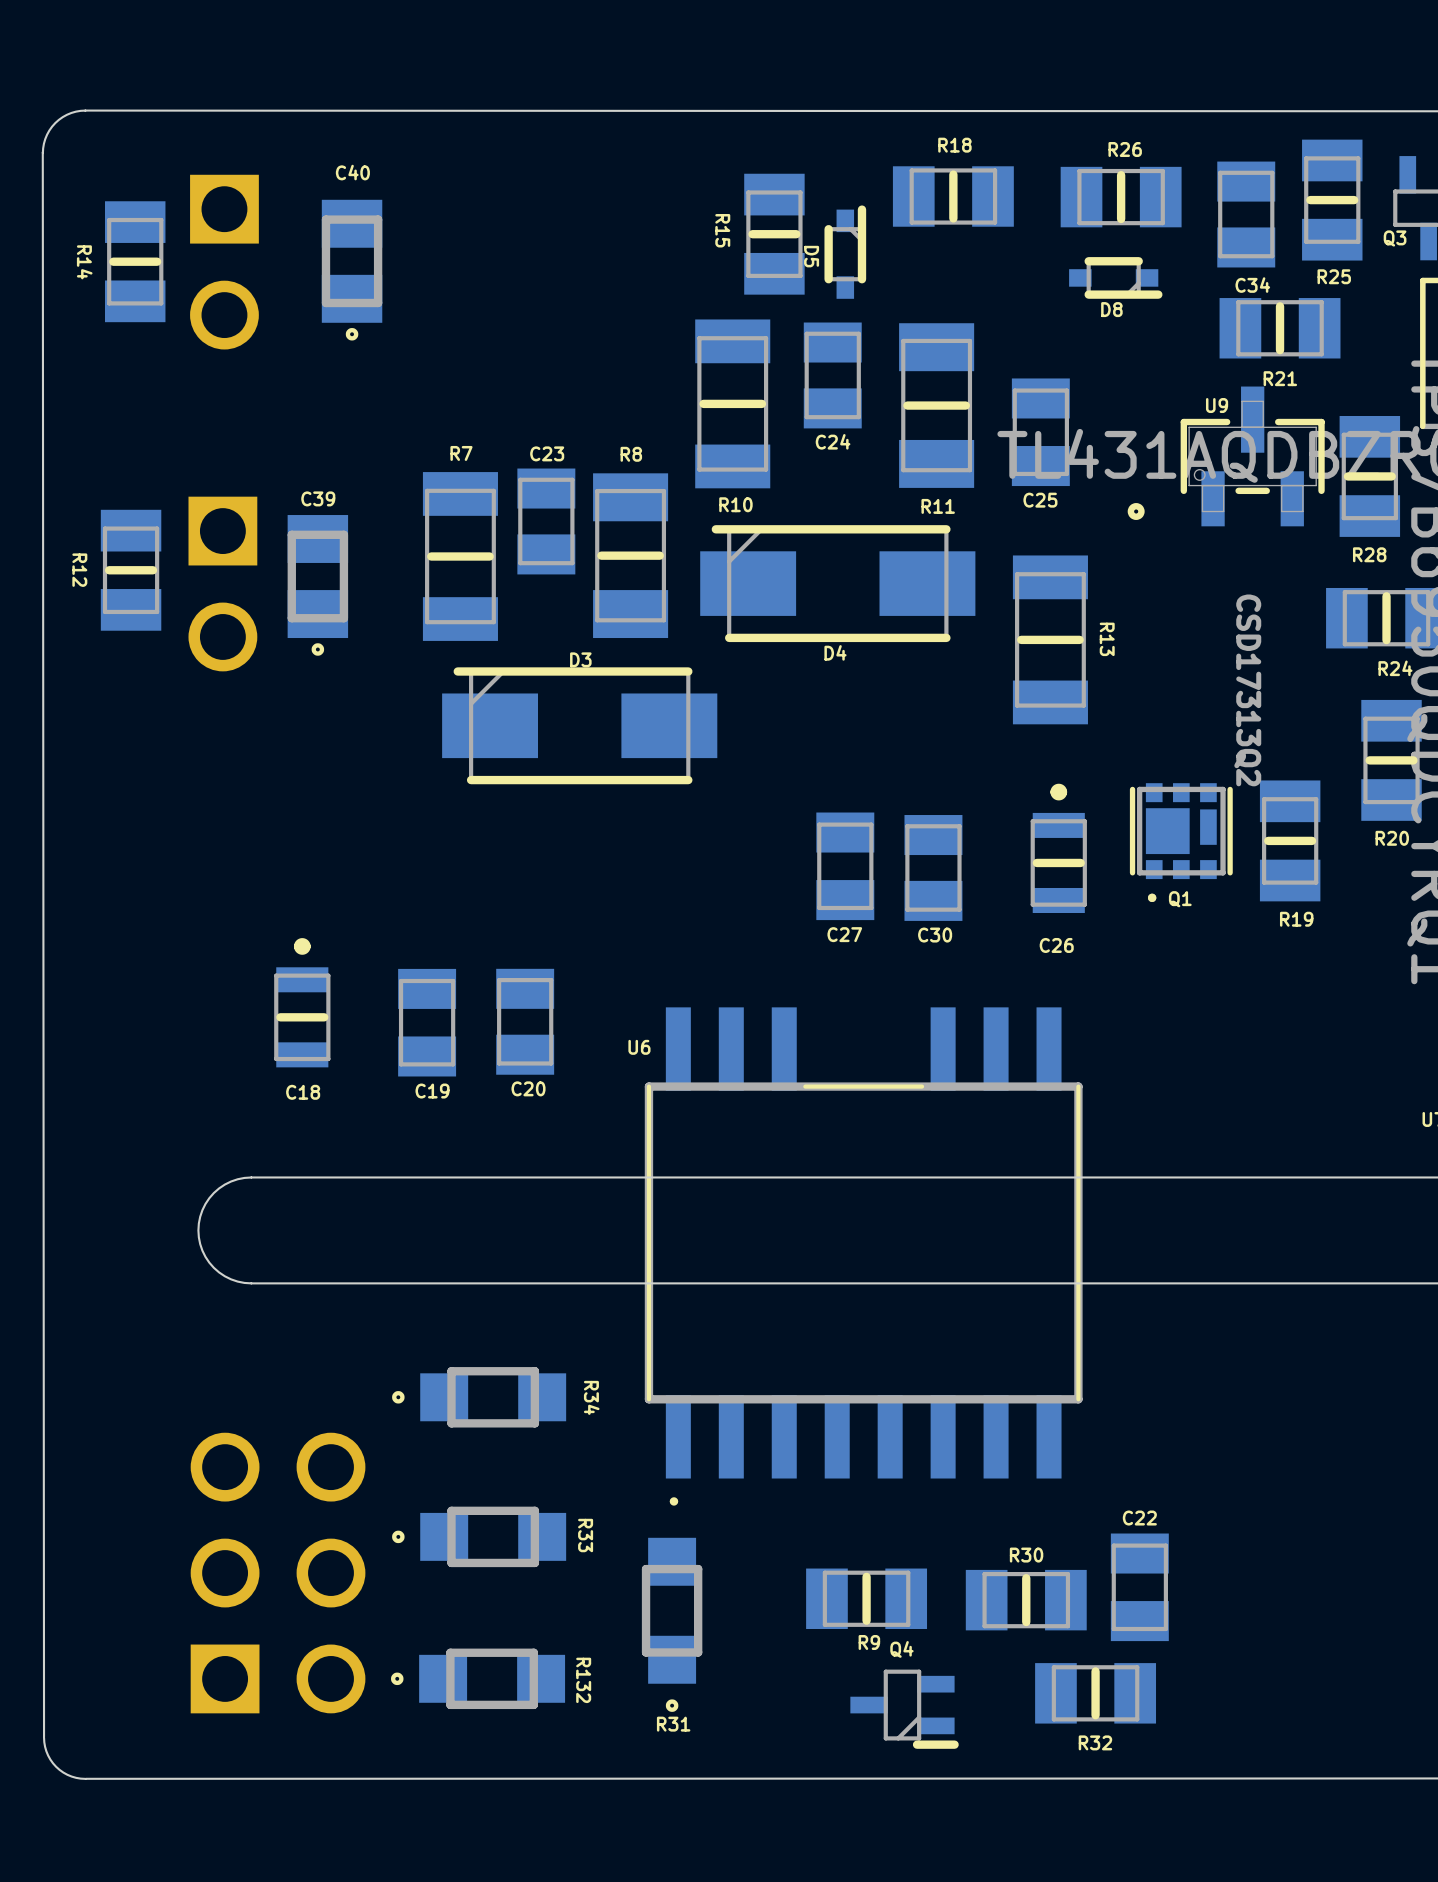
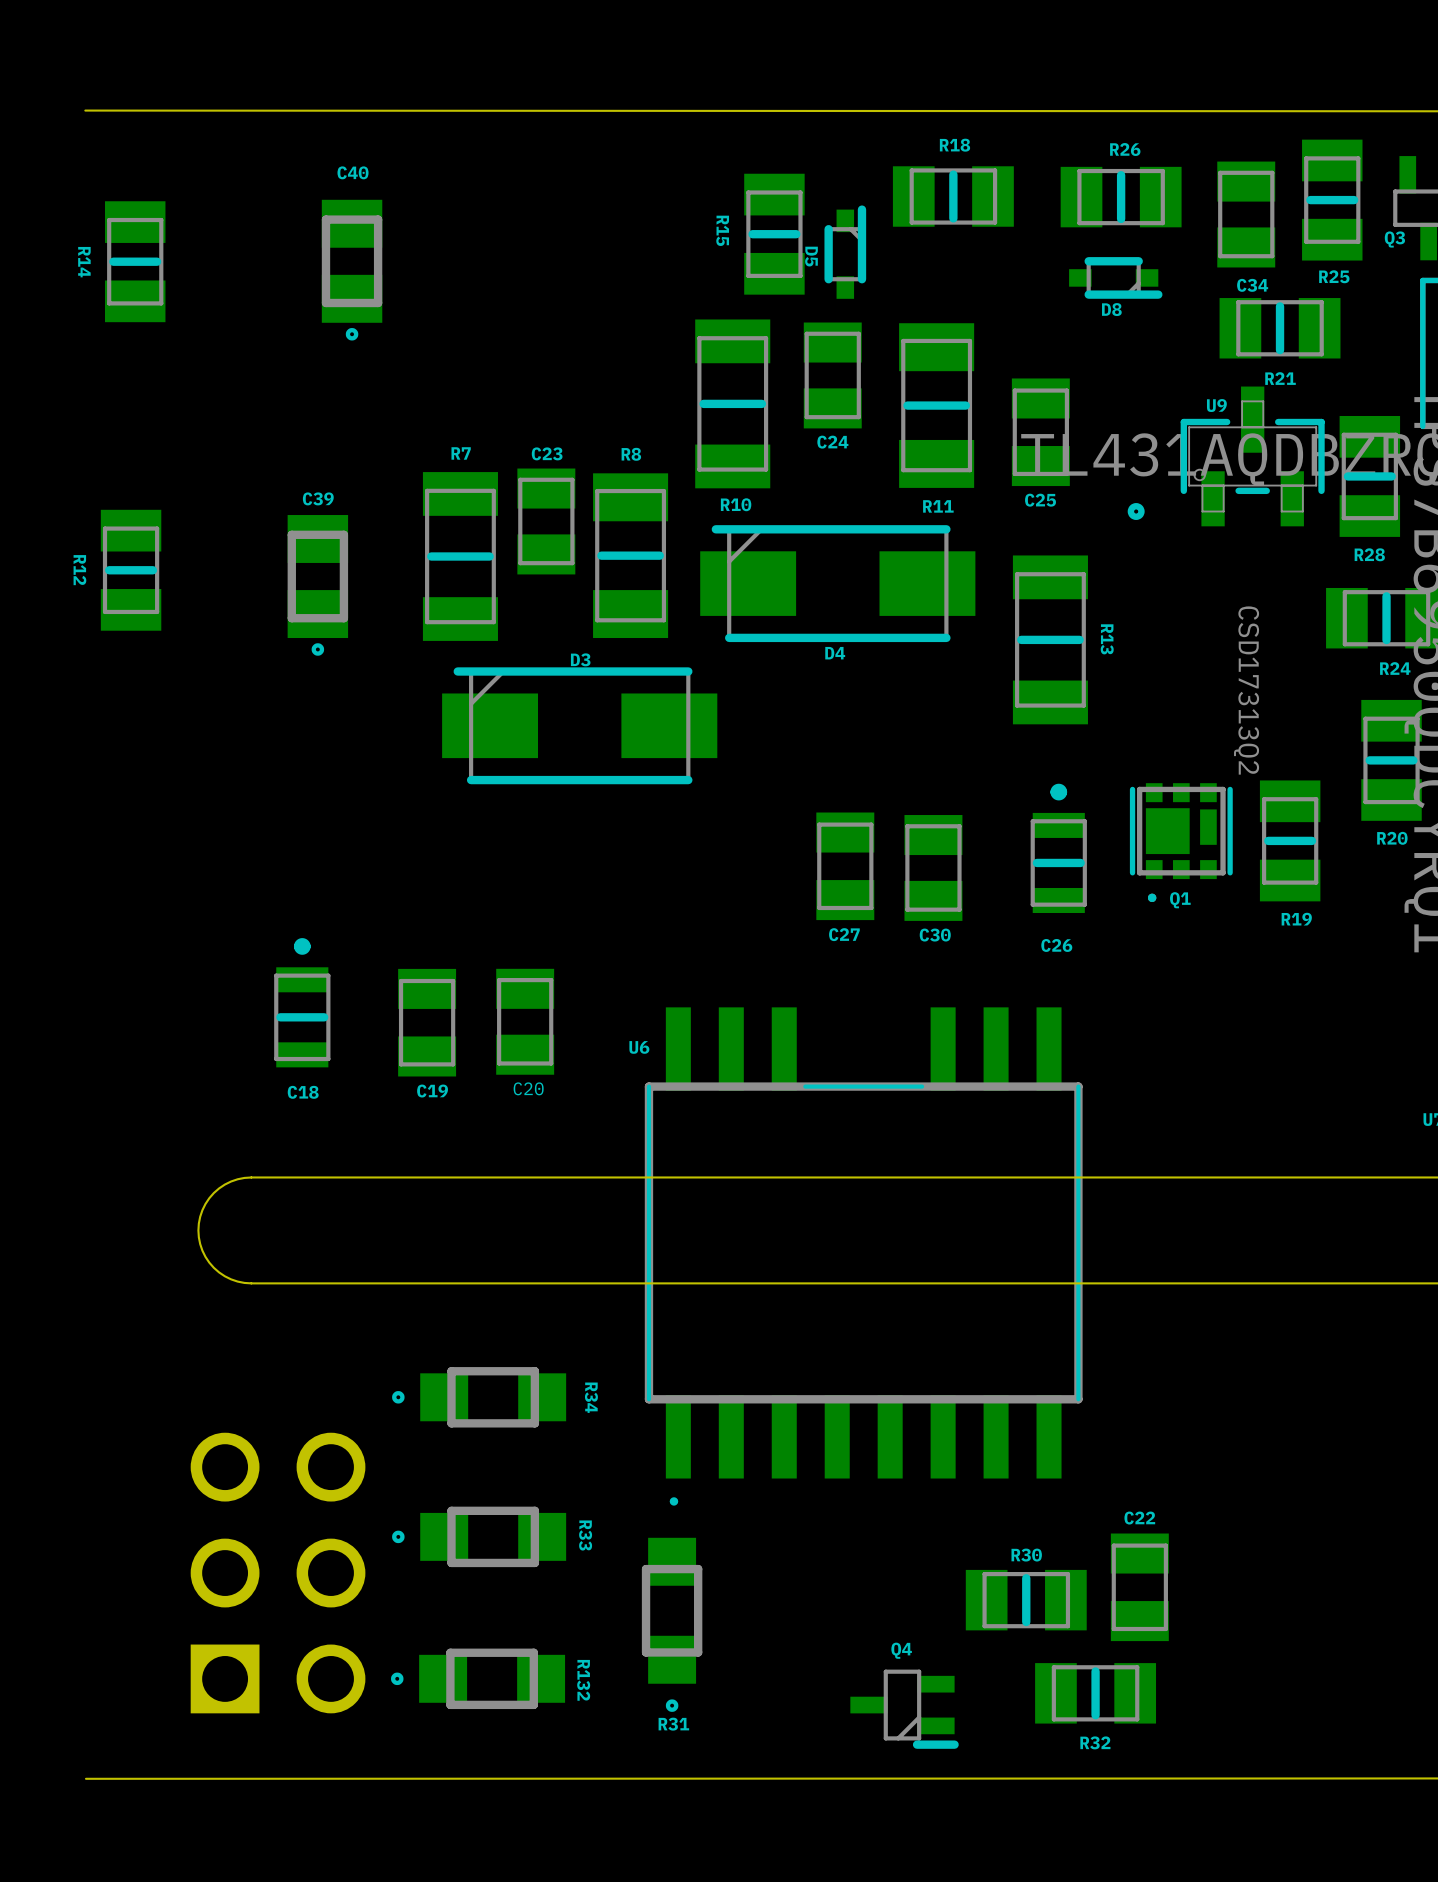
board edge: (85, 110) (66, 114) (55, 123) (45, 139) (42, 153) -> none
board edge: (42, 152) (44, 1736) -> none
part: (224, 262) -> none
part: (222, 584) -> none
R9: (866, 1598) -> none
board edge: (44, 1737) (48, 1755) (56, 1766) (71, 1776) (85, 1778) -> none

